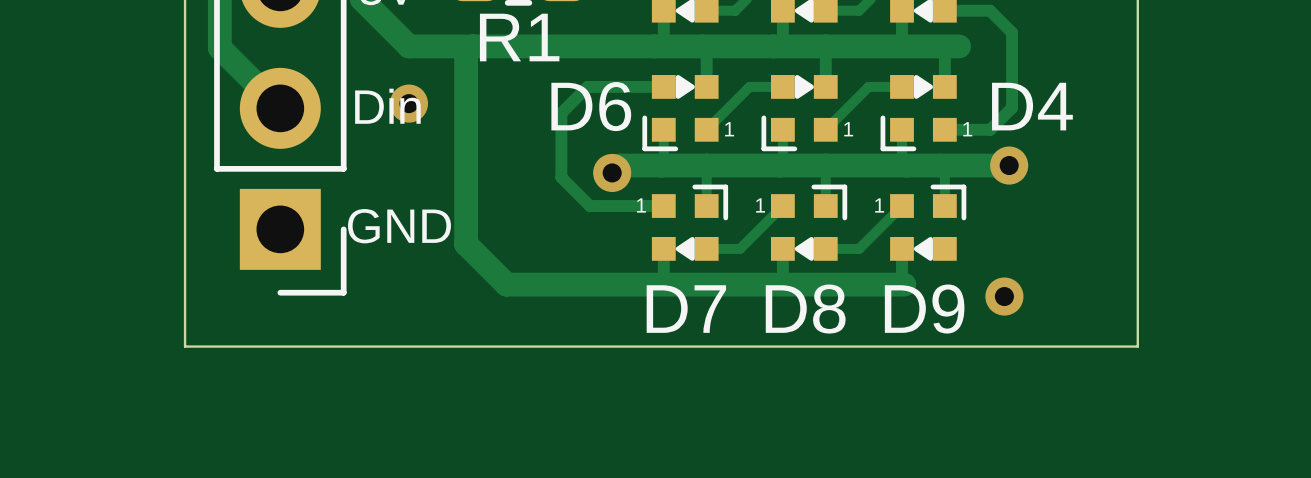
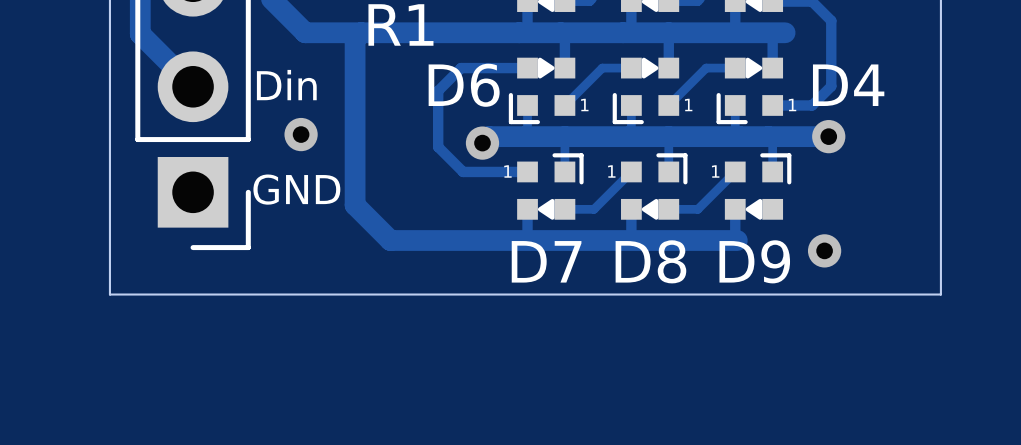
via position: (408, 103) -> (301, 134)

